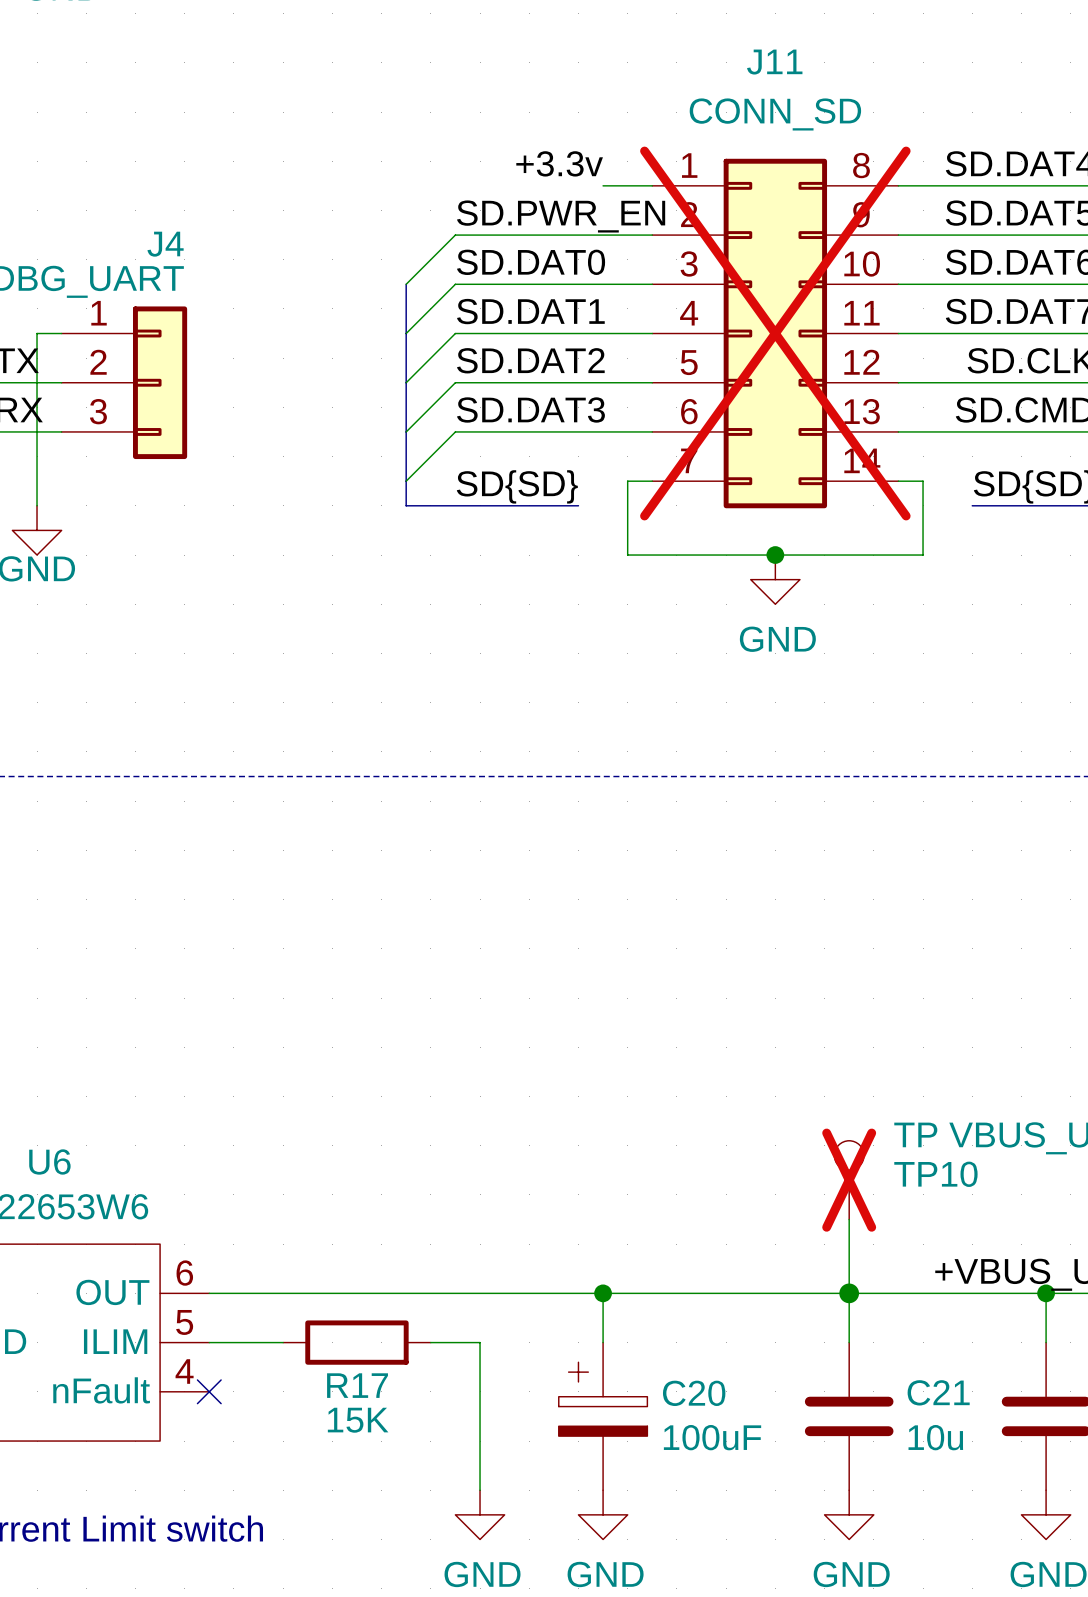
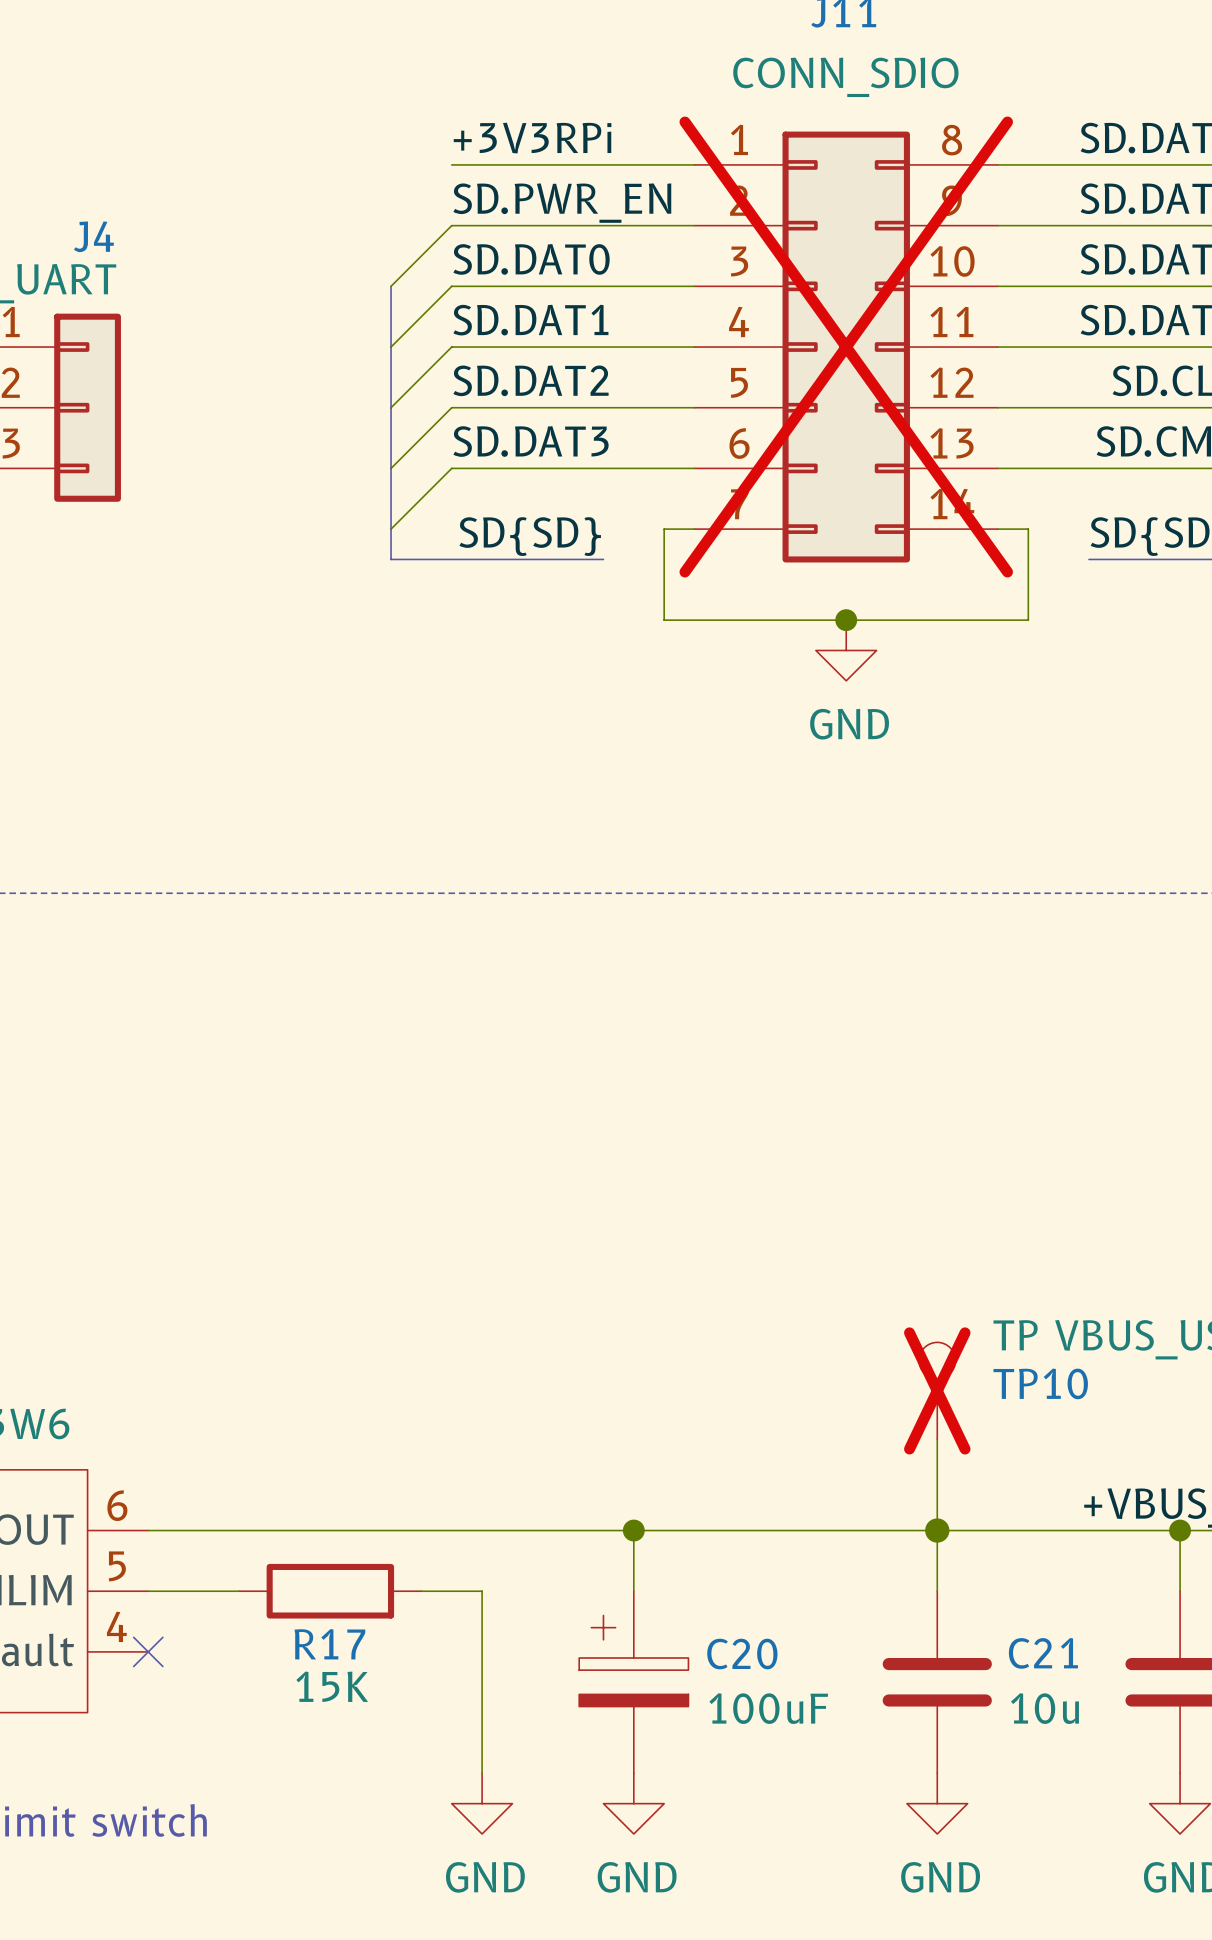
J11 value: CONN_SD (775, 114) -> CONN_SDIO (845, 77)
label: none -> +3V3RPi (532, 138)
label: +3.3v (559, 163) -> none
wire: none -> (451, 164) (633, 164)

